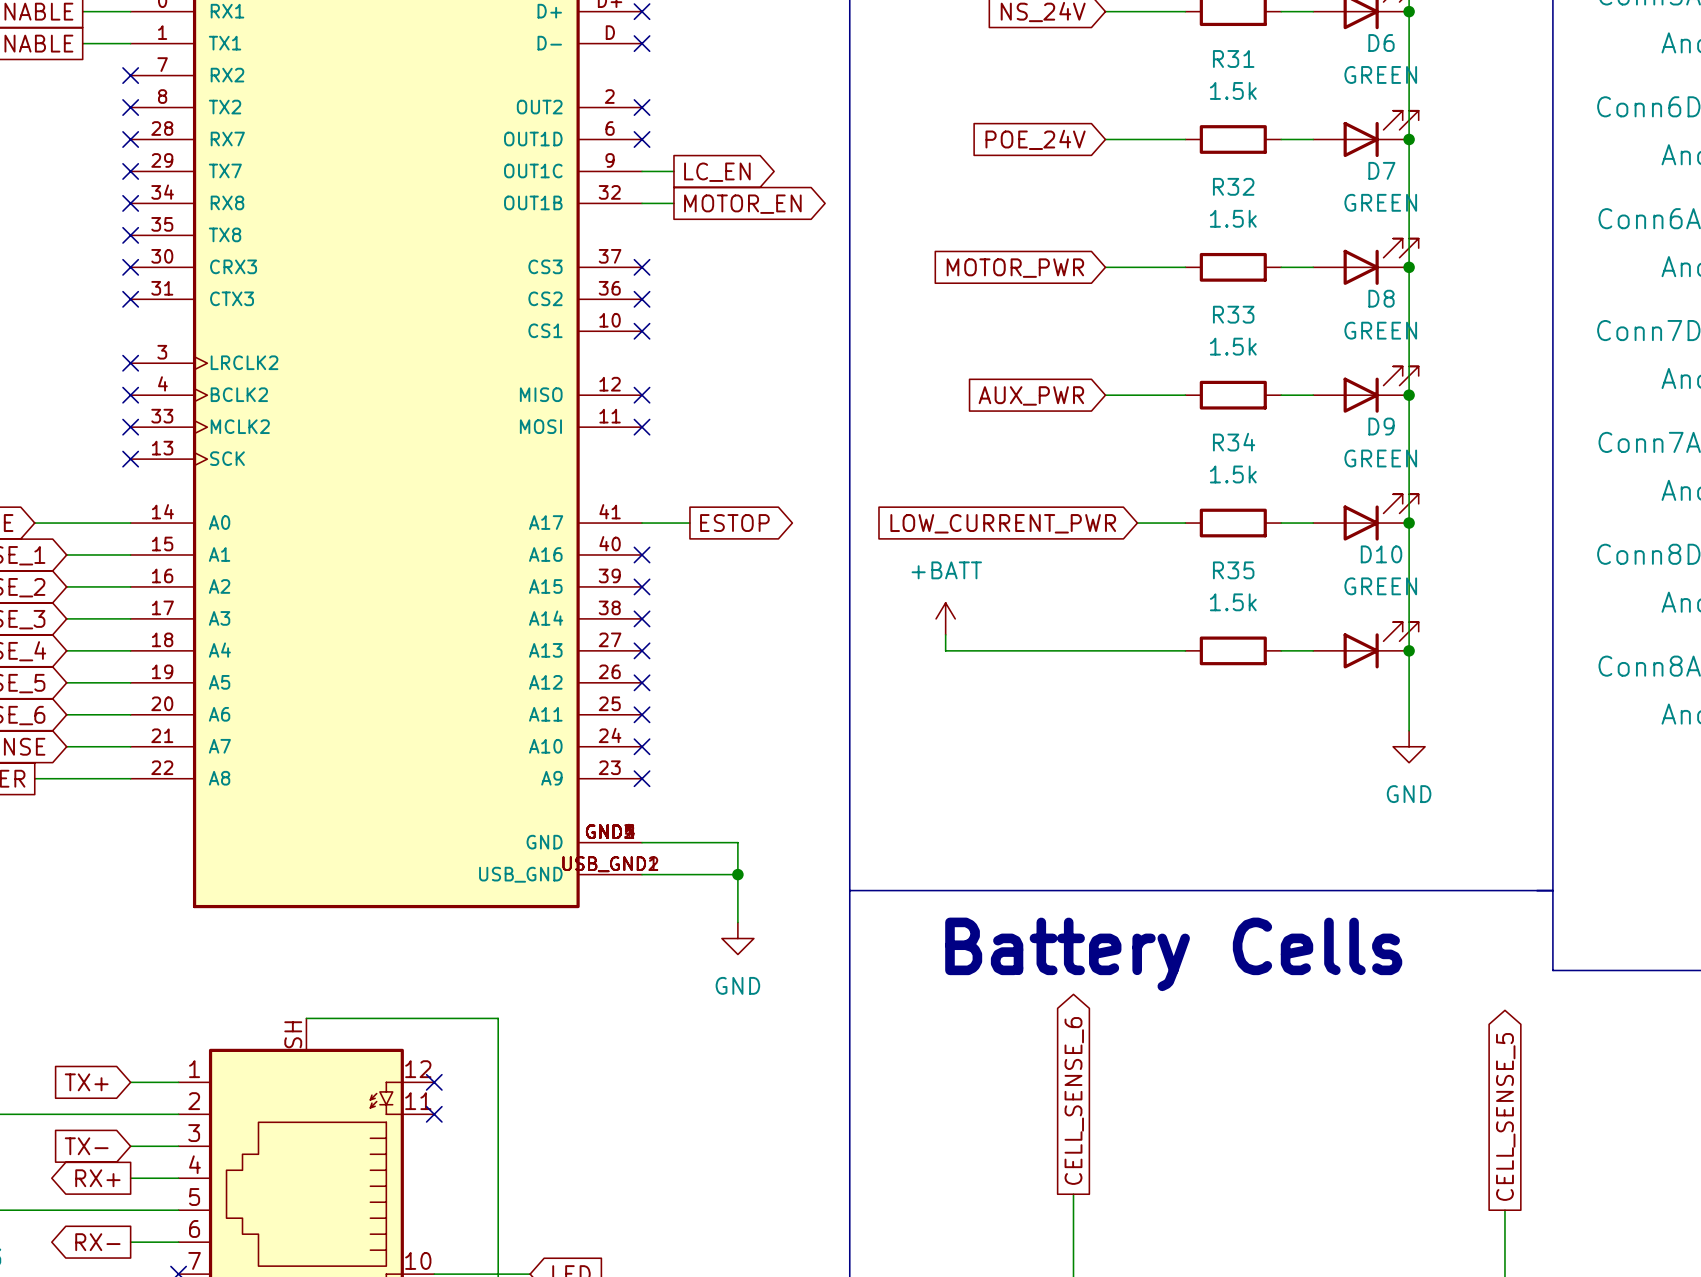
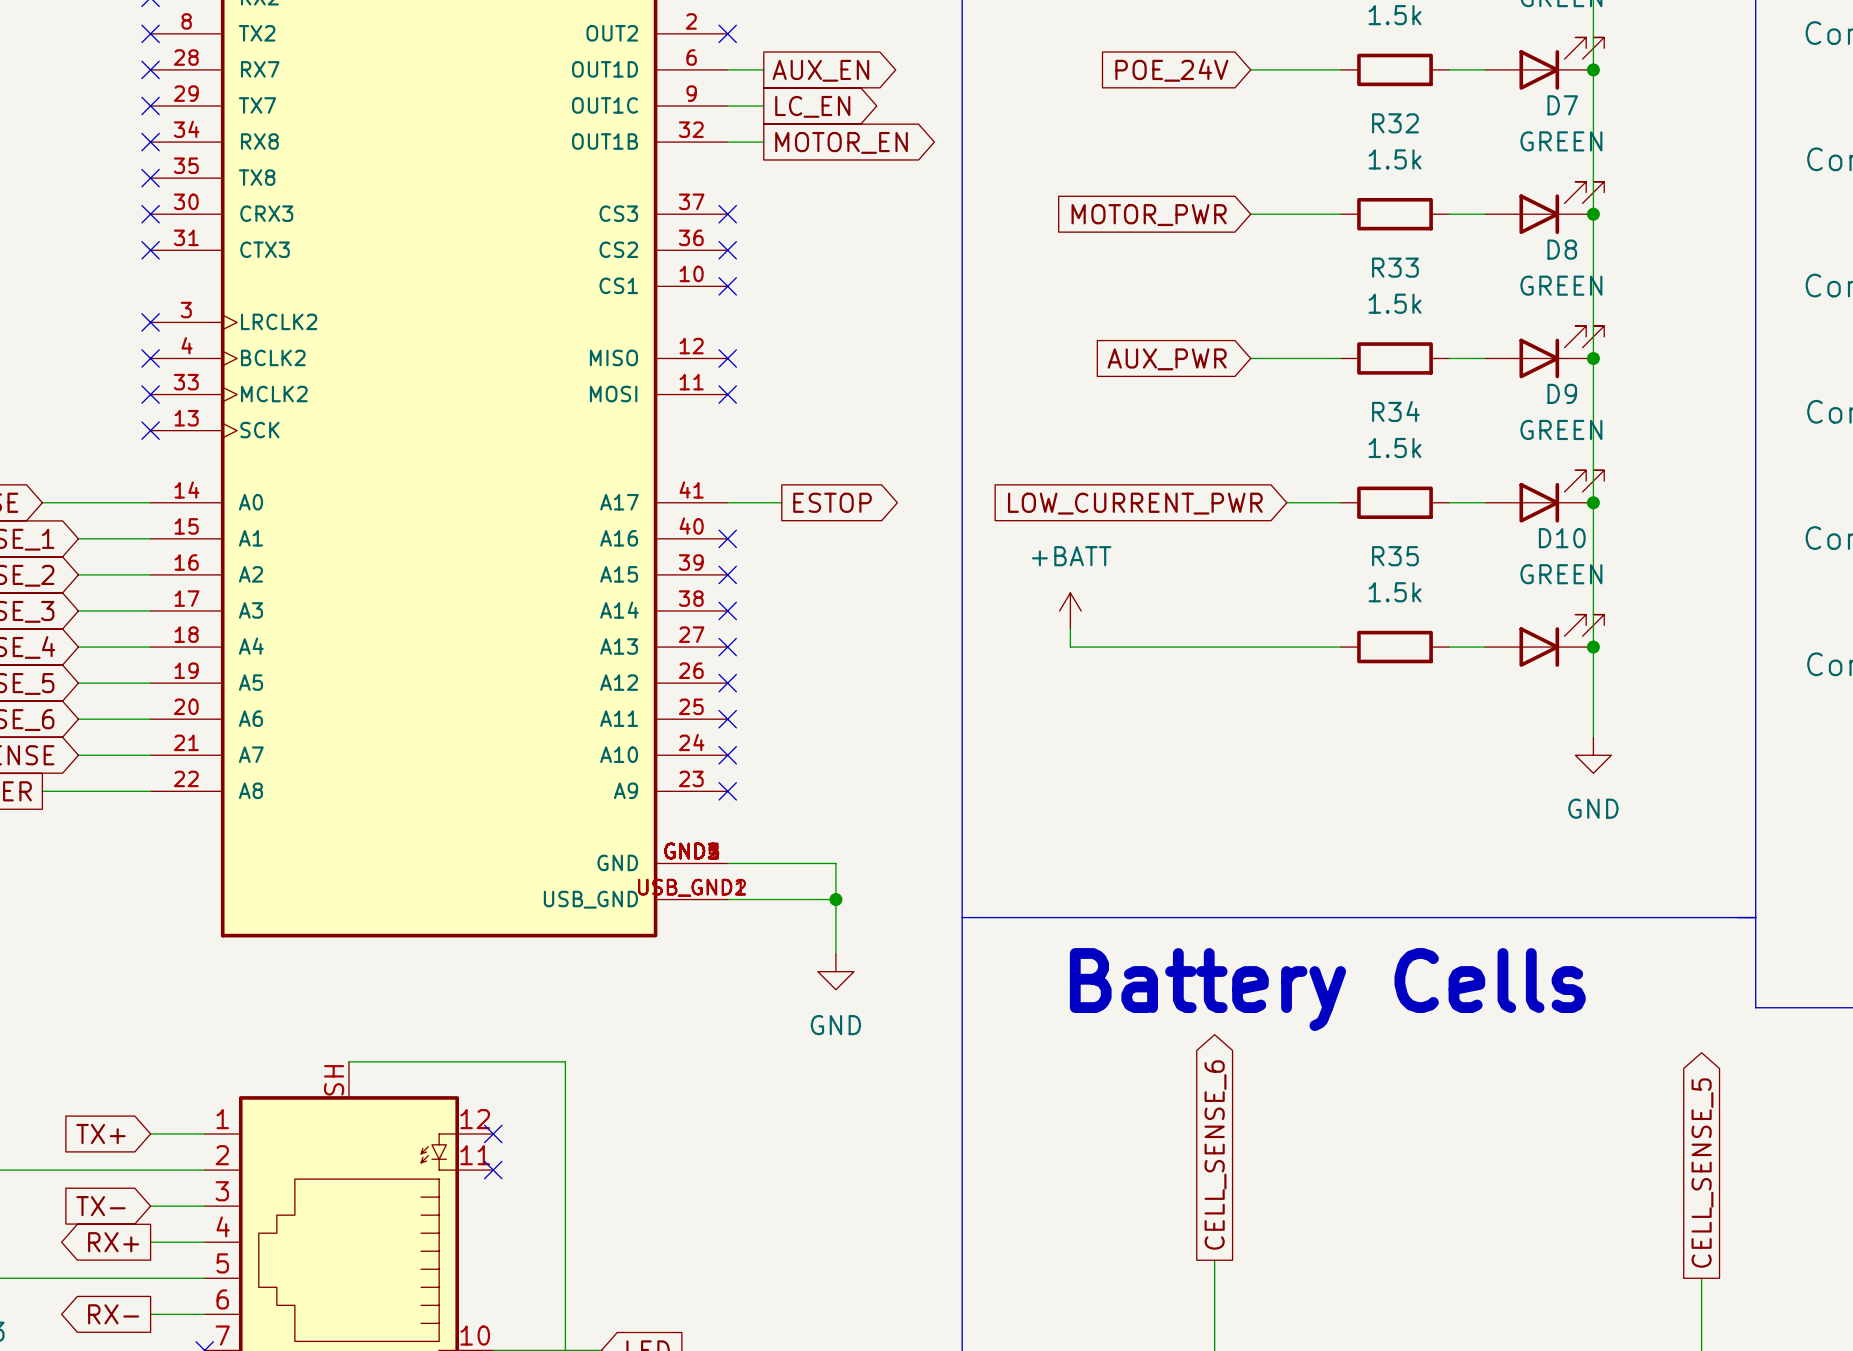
wire: none -> (727, 69) (763, 69)
no-connect mark: (642, 139) -> none
global label: none -> AUX_EN (820, 70)

